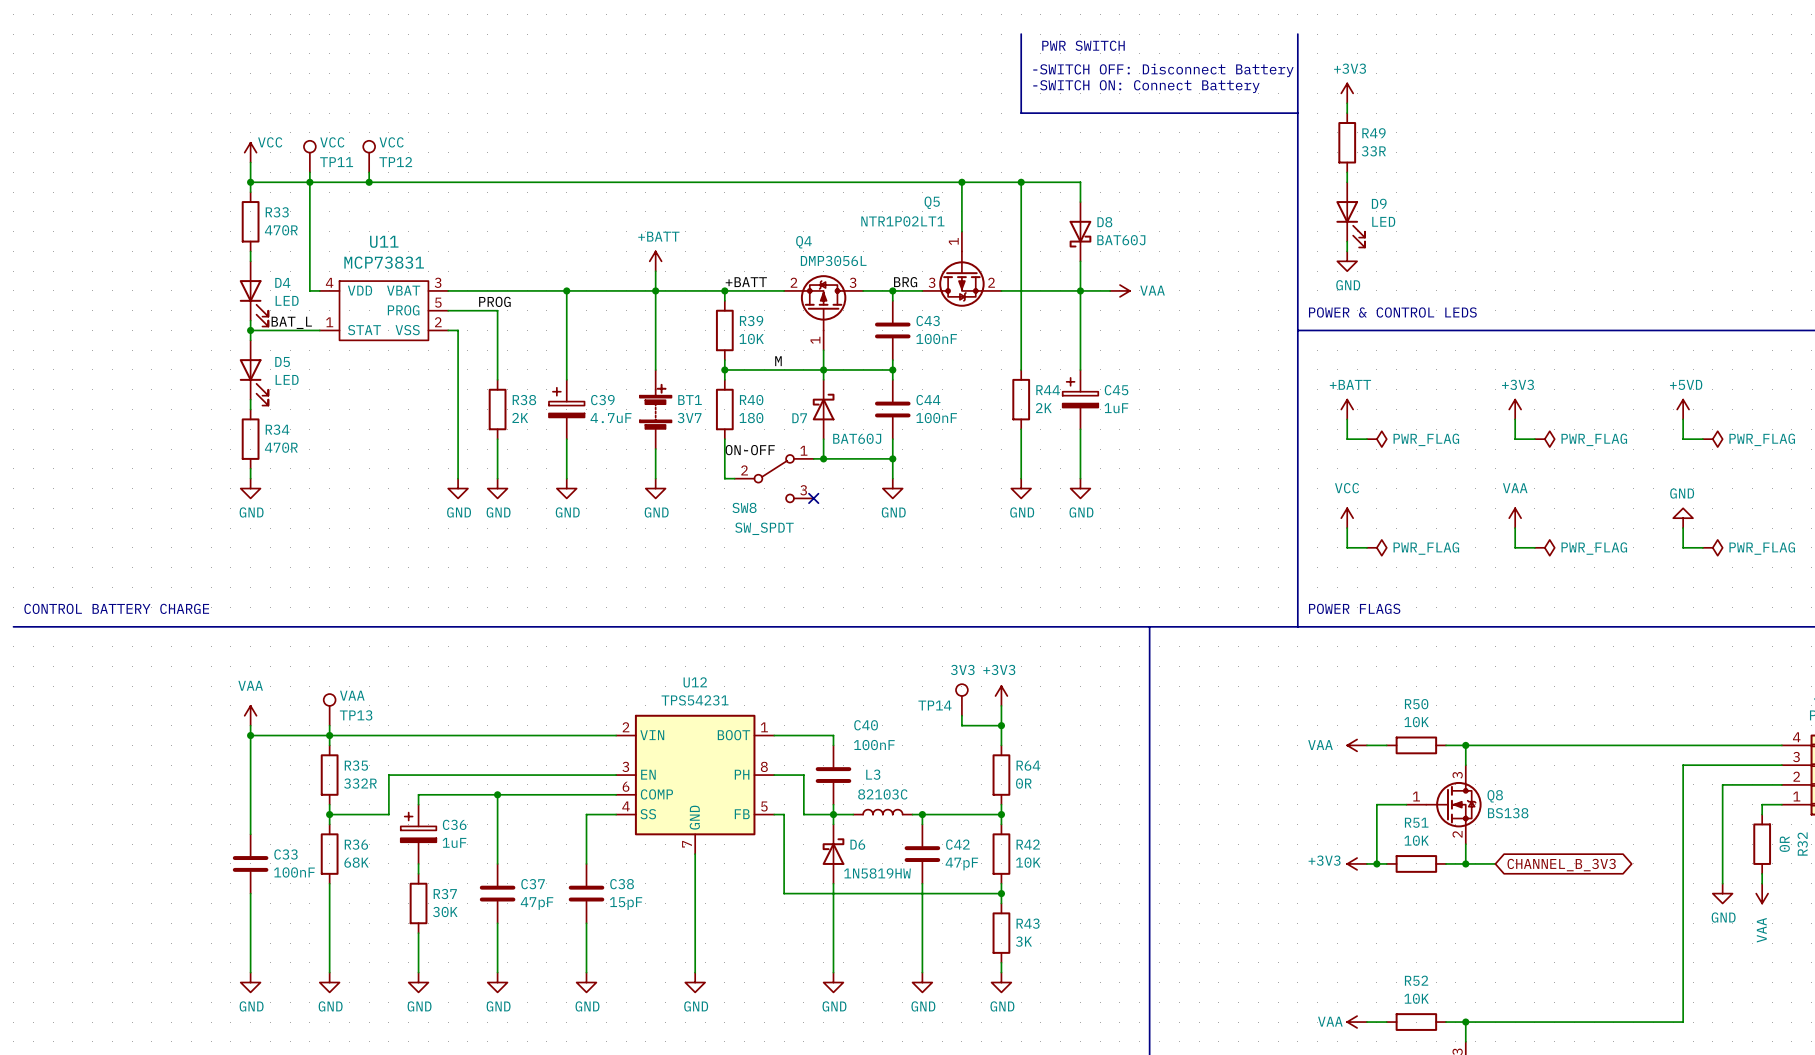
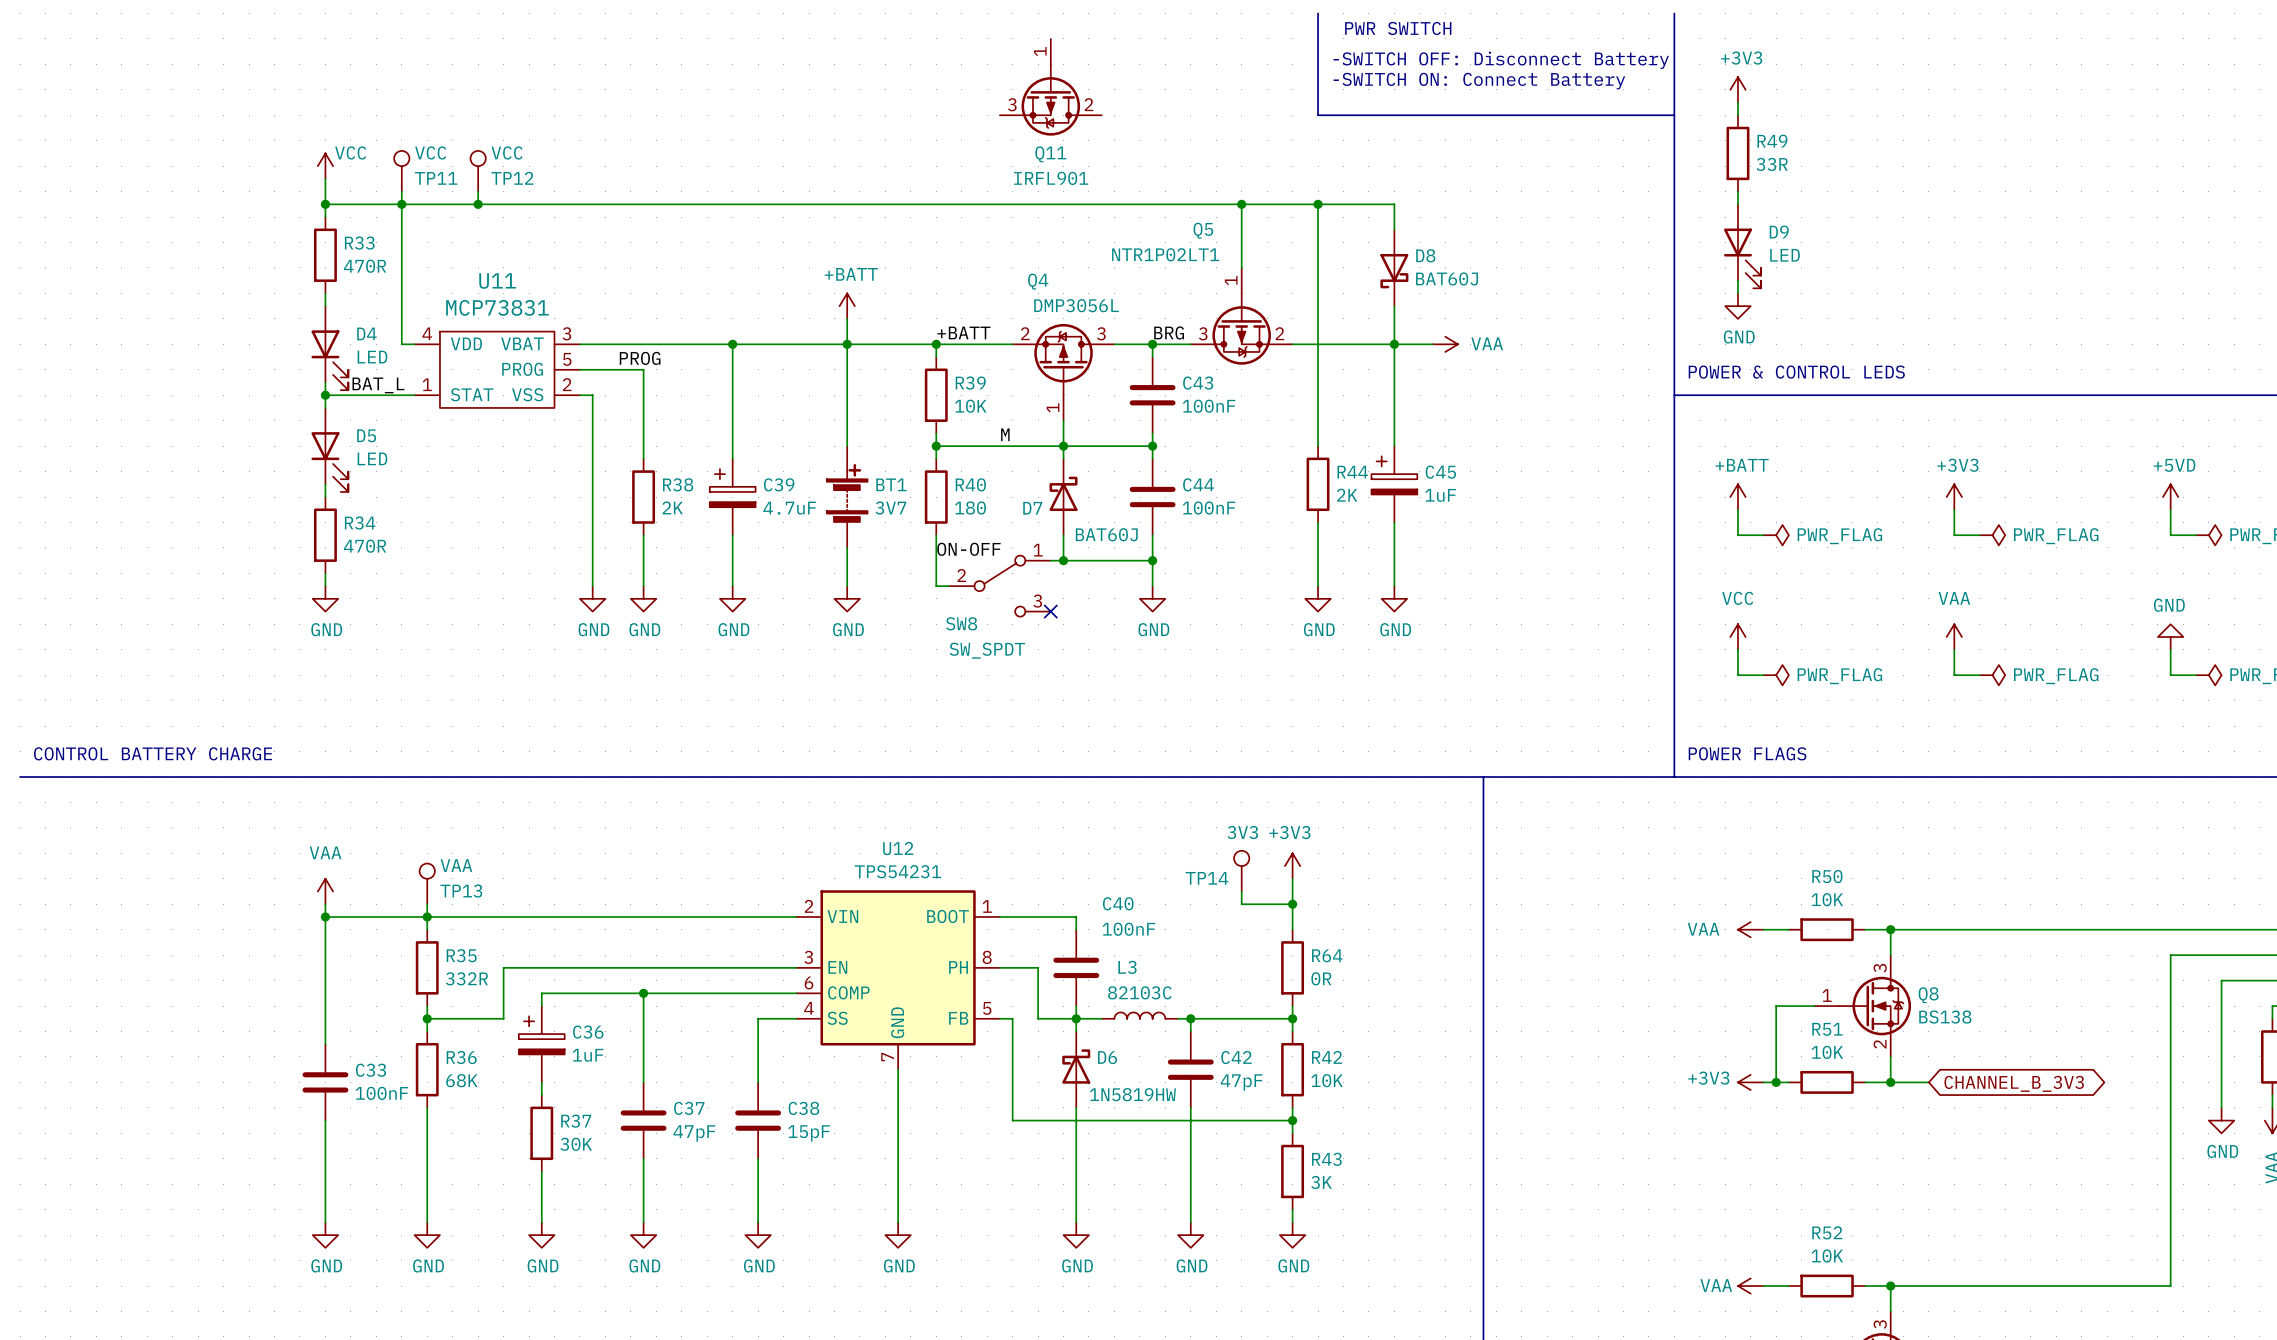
Q11: none -> IRFL901 (1050, 87)

